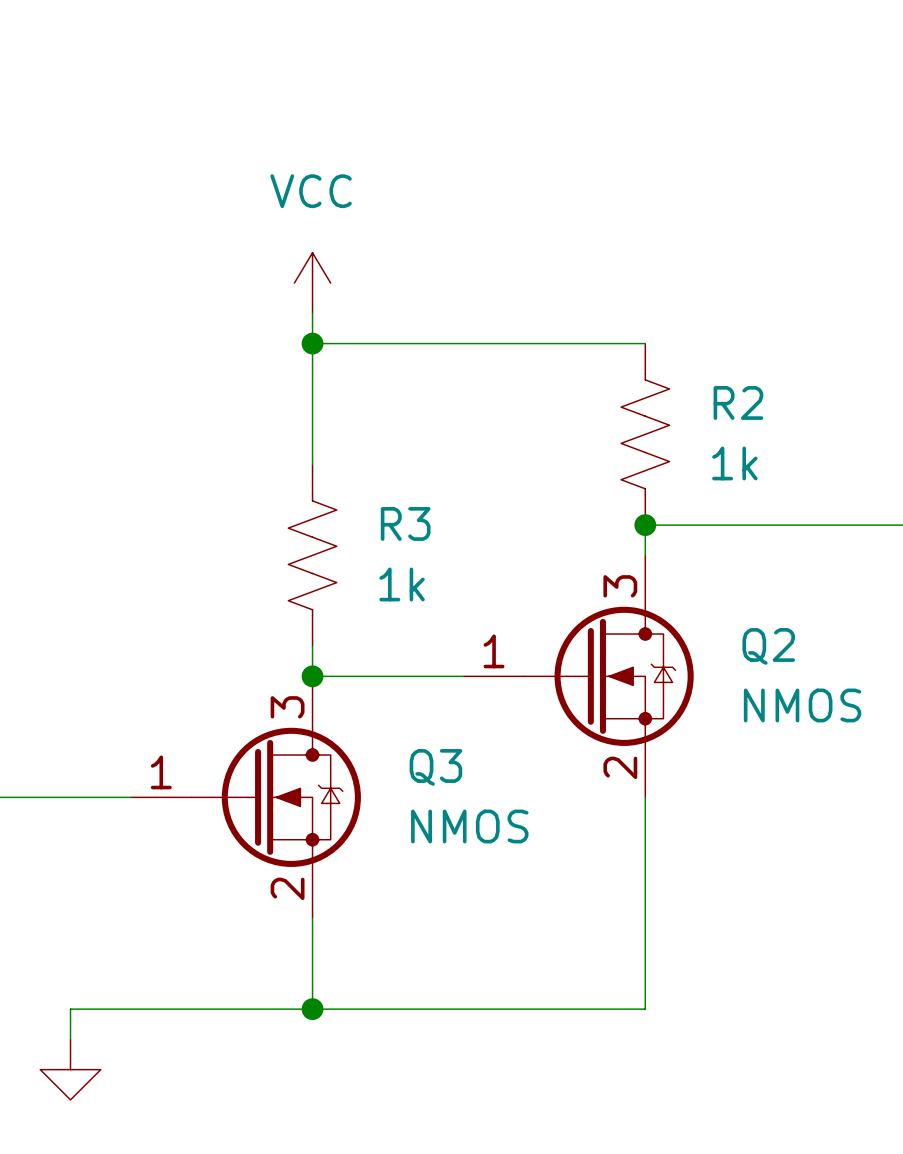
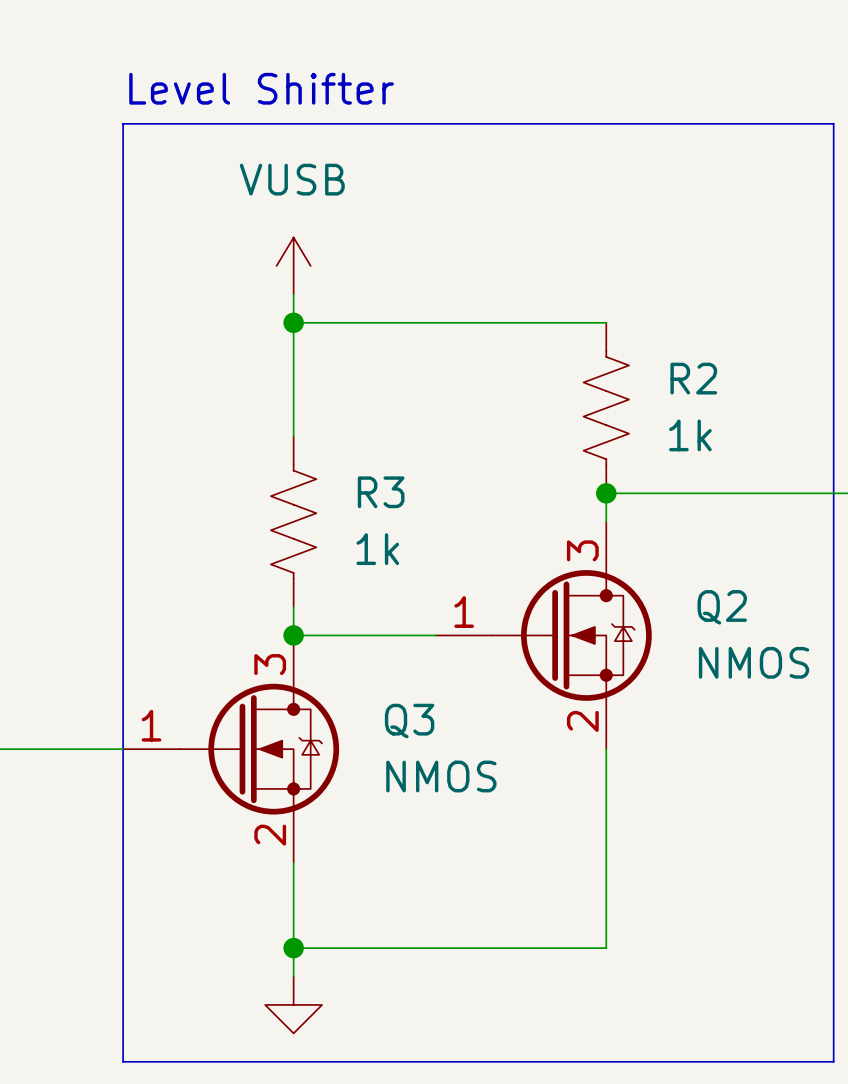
text: none -> Level Shifter (261, 88)
line: none -> (123, 123) (833, 123) (833, 1061) (123, 1061) (123, 123)
power symbol: VCC (312, 283) -> VUSB (293, 265)
wire: (312, 1009) (70, 1009) (70, 1039) -> (293, 948) (293, 976)
power symbol position: (70, 1069) -> (293, 1004)

